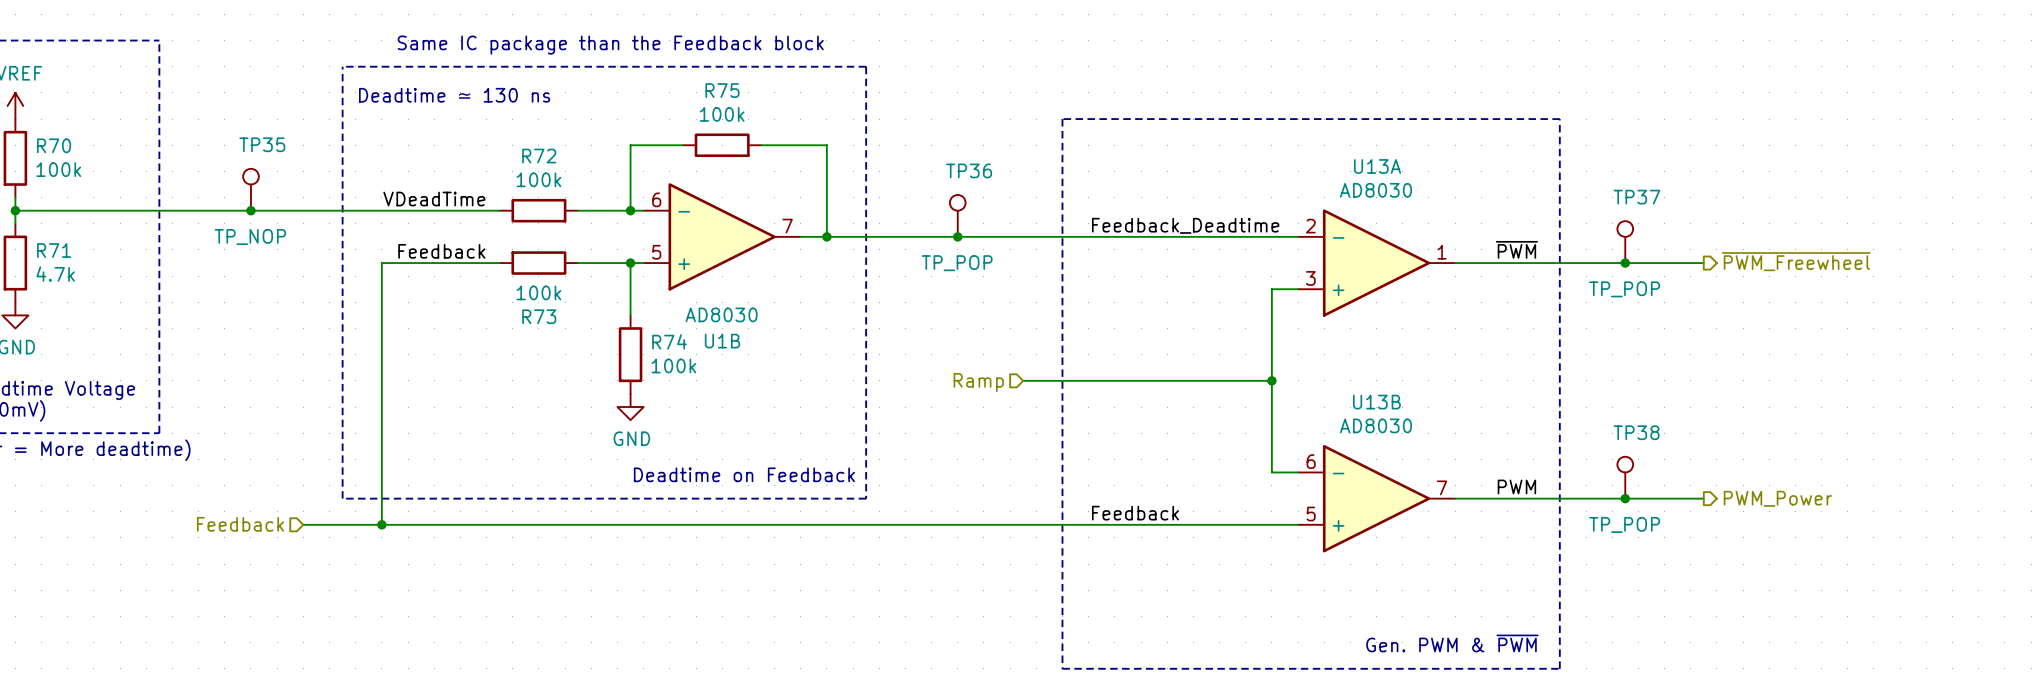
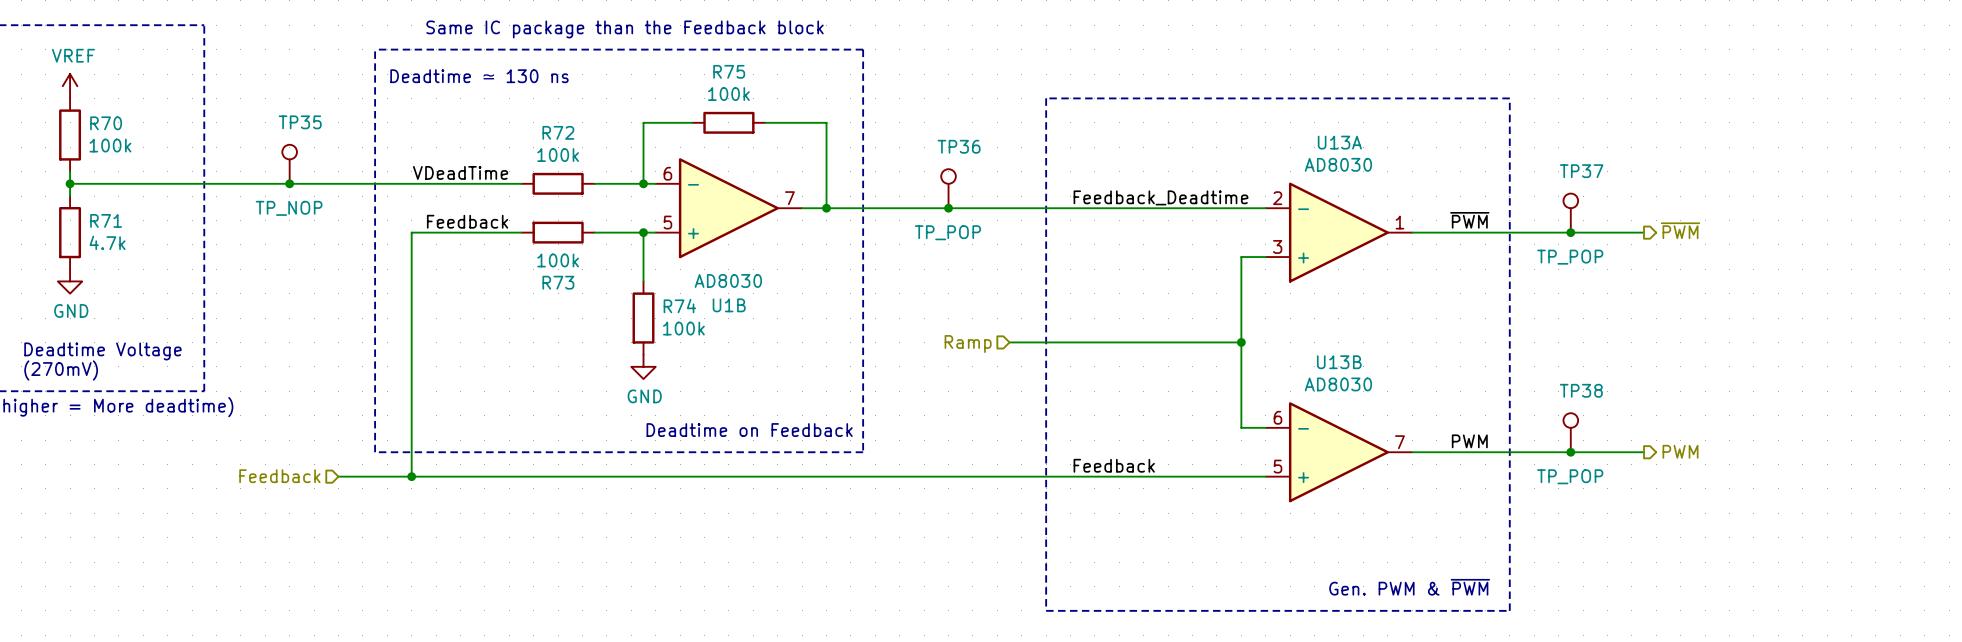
hierarchical label: ~{PWM_Freewheel} (1796, 261) -> ~{PWM} (1680, 230)
hierarchical label: PWM_Power (1777, 498) -> PWM (1680, 451)

